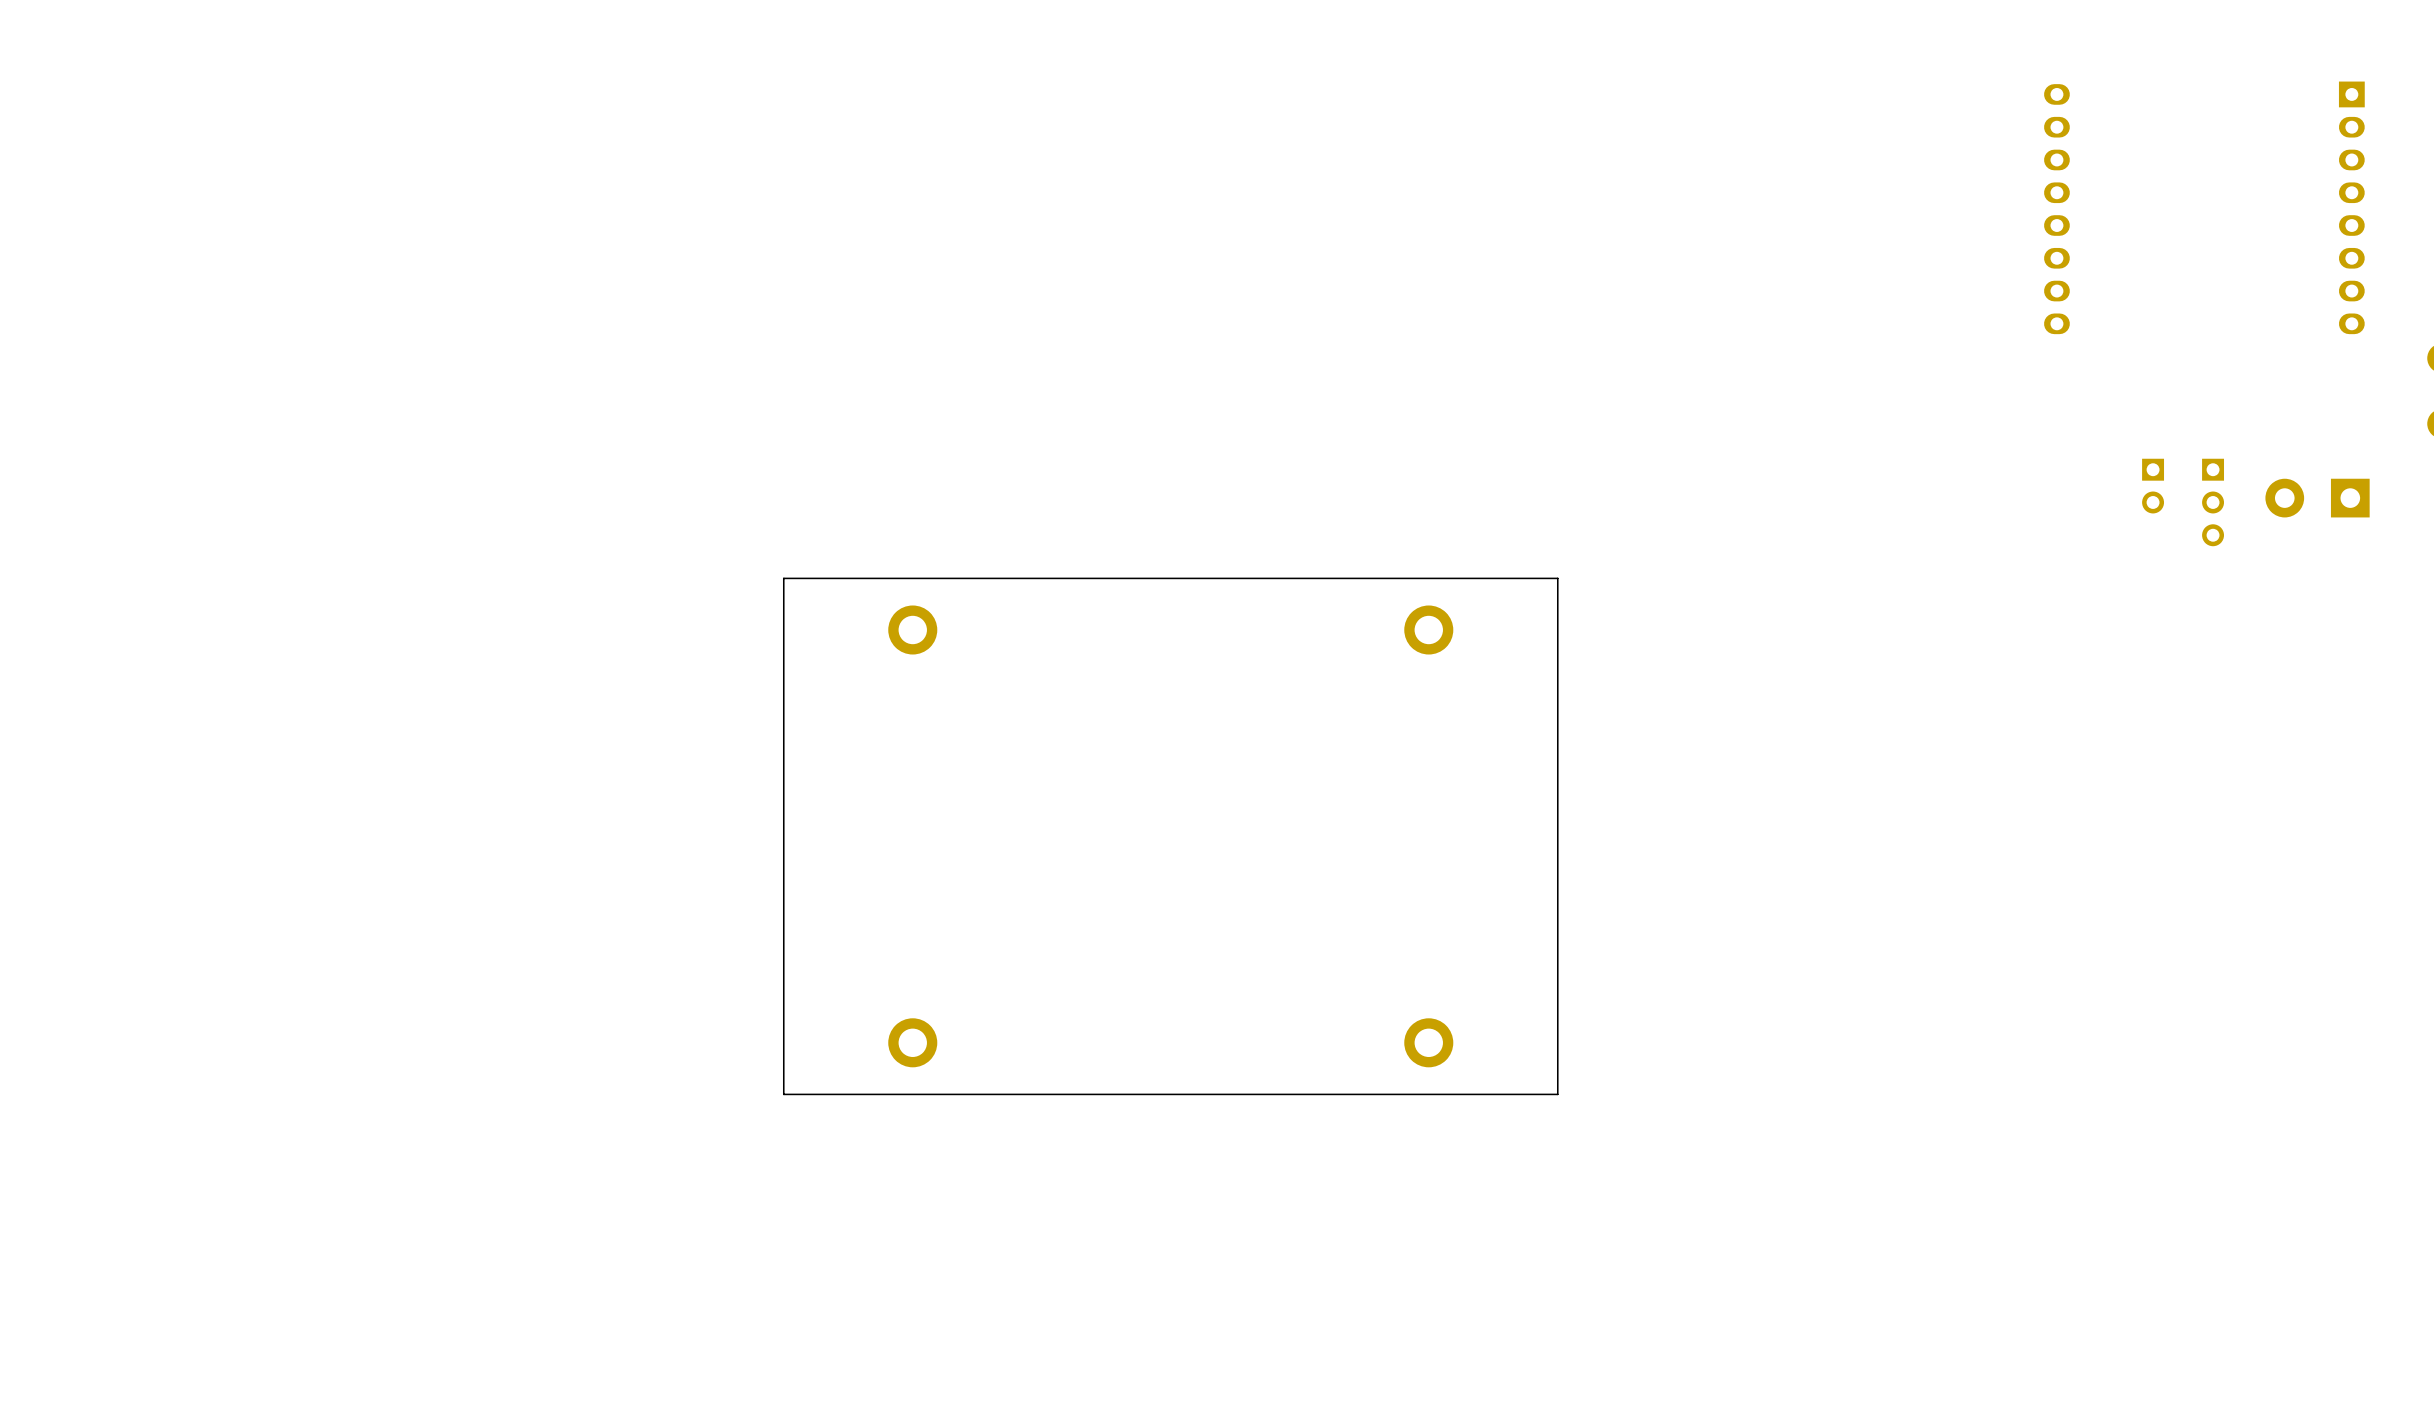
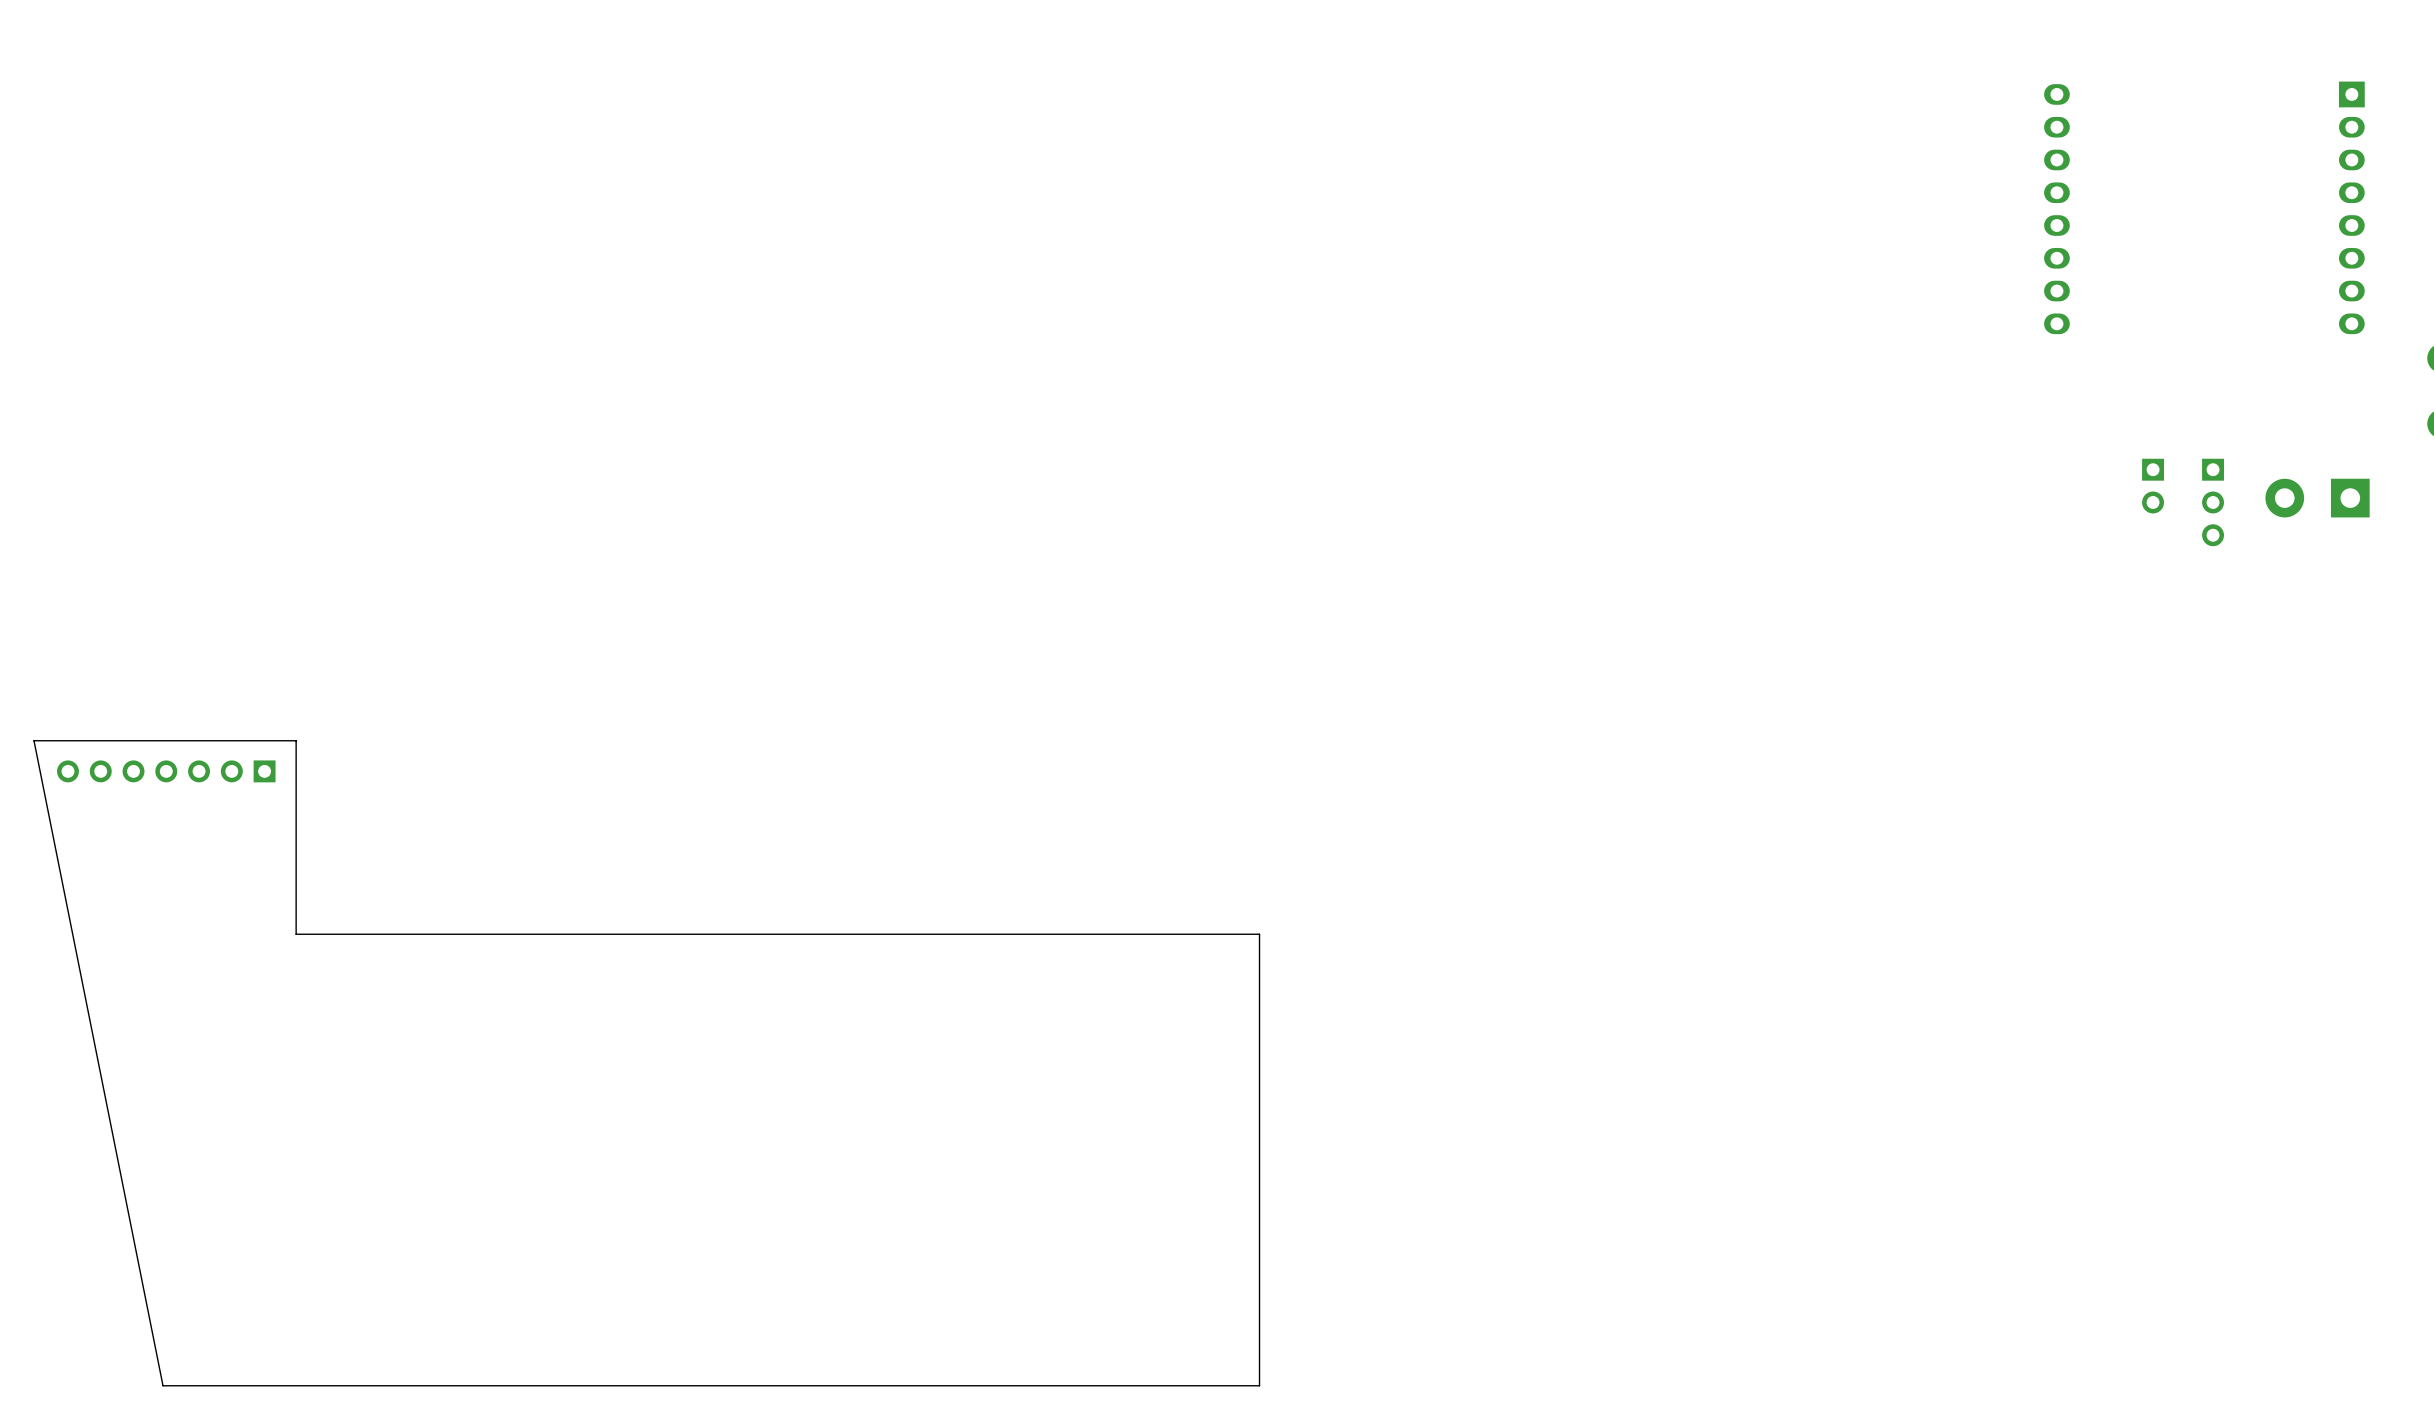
board edge: (1557, 578) (783, 578) (783, 1094) (1557, 1094) (1557, 578) -> none
part: (912, 630) -> none
part: (1428, 630) -> none
board edge: none -> (296, 740) (296, 934) (1259, 934) (1259, 1385) (163, 1385) (34, 740) (296, 740)
part: none -> (166, 771)
part: (912, 1042) -> none
part: (1428, 1042) -> none

